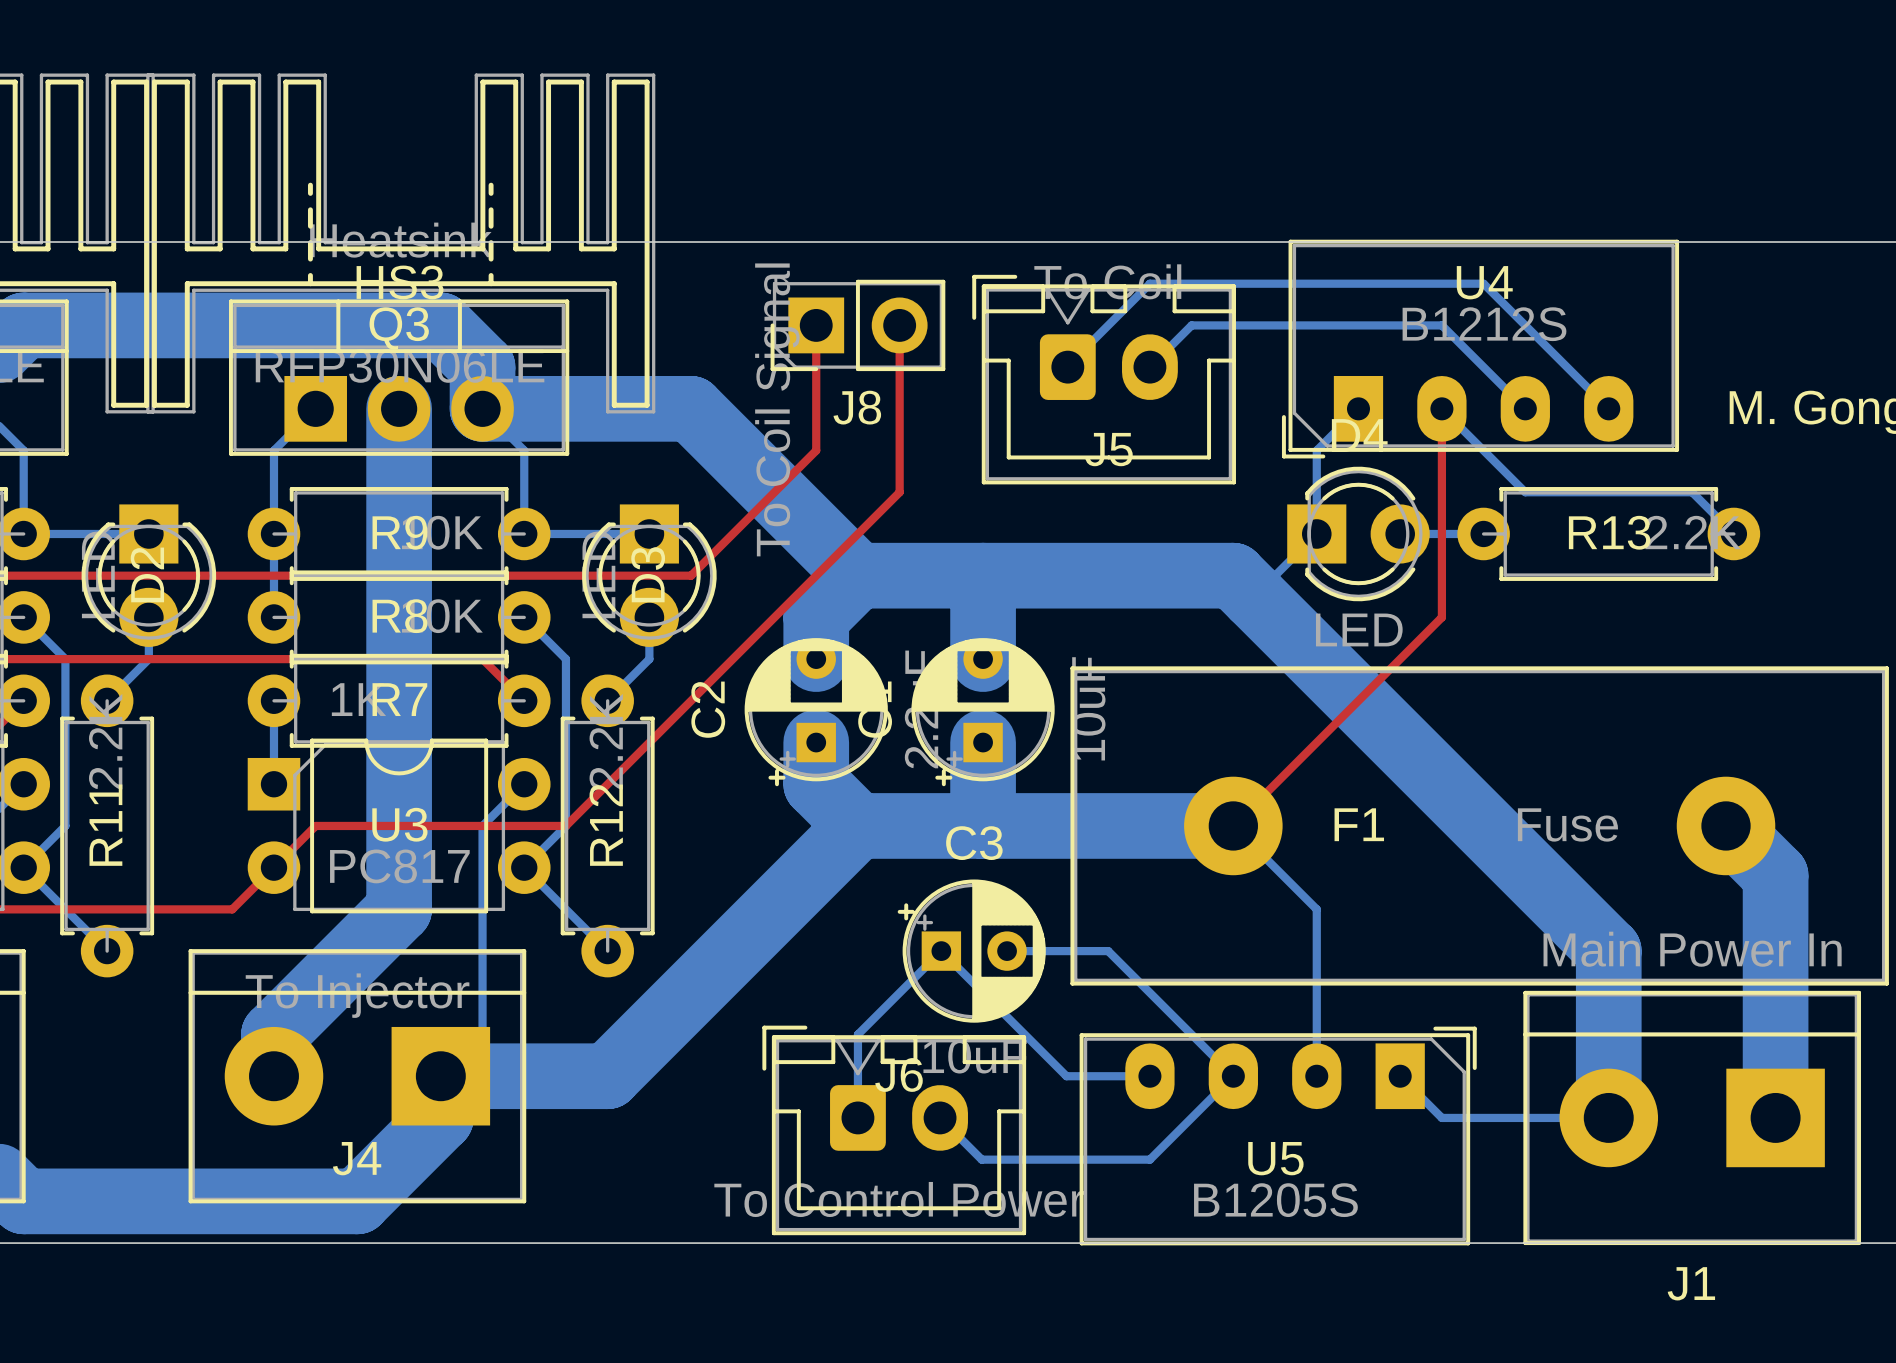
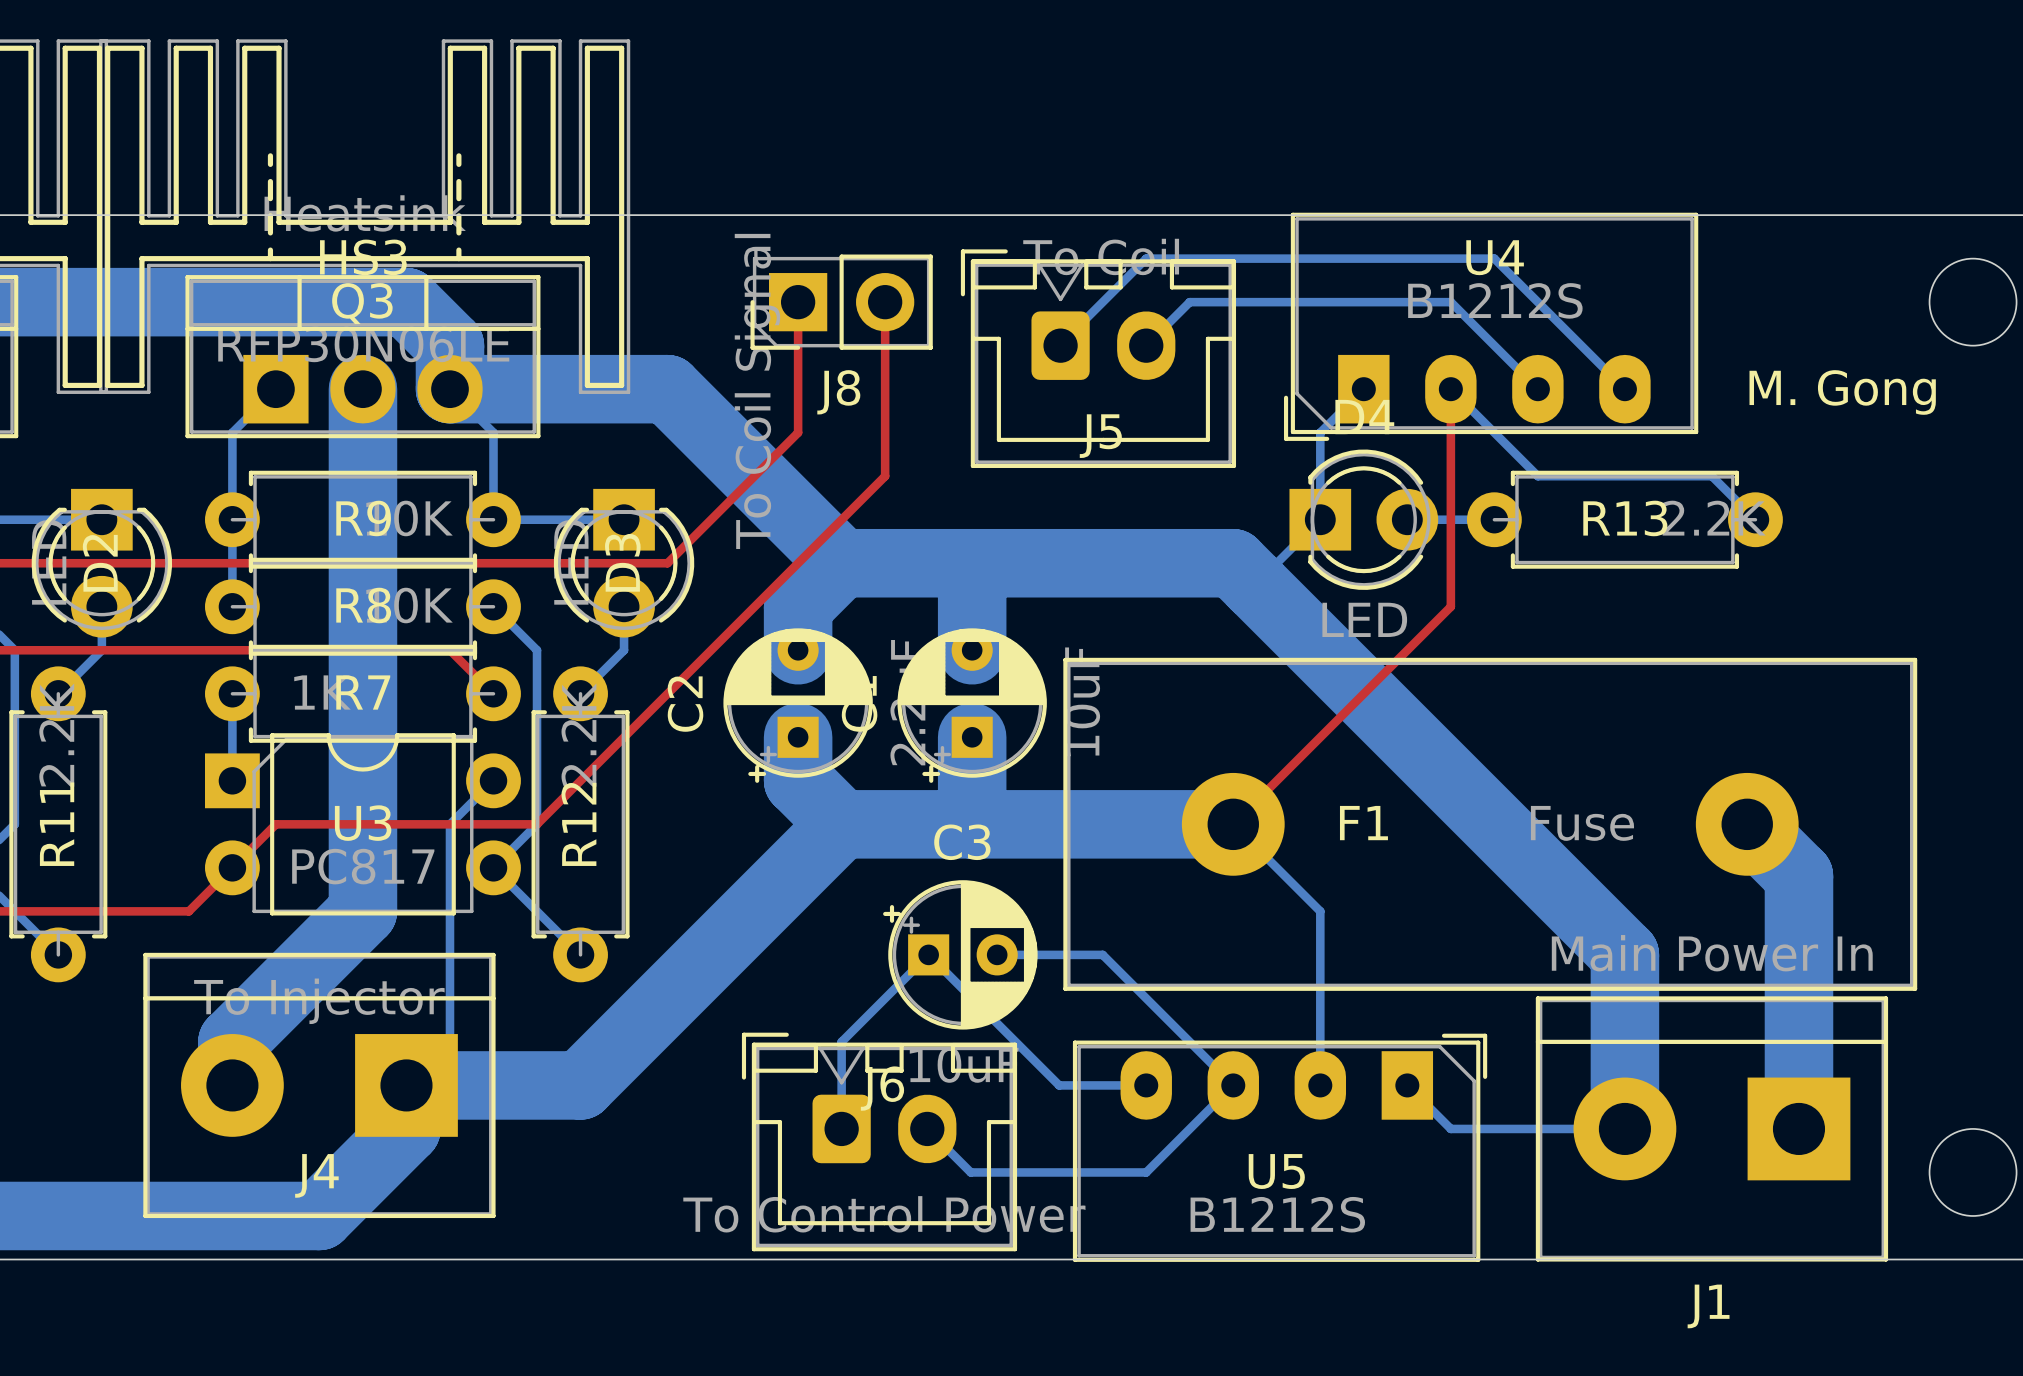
U5 value: B1205S (1275, 1200) -> B1212S (1277, 1214)

